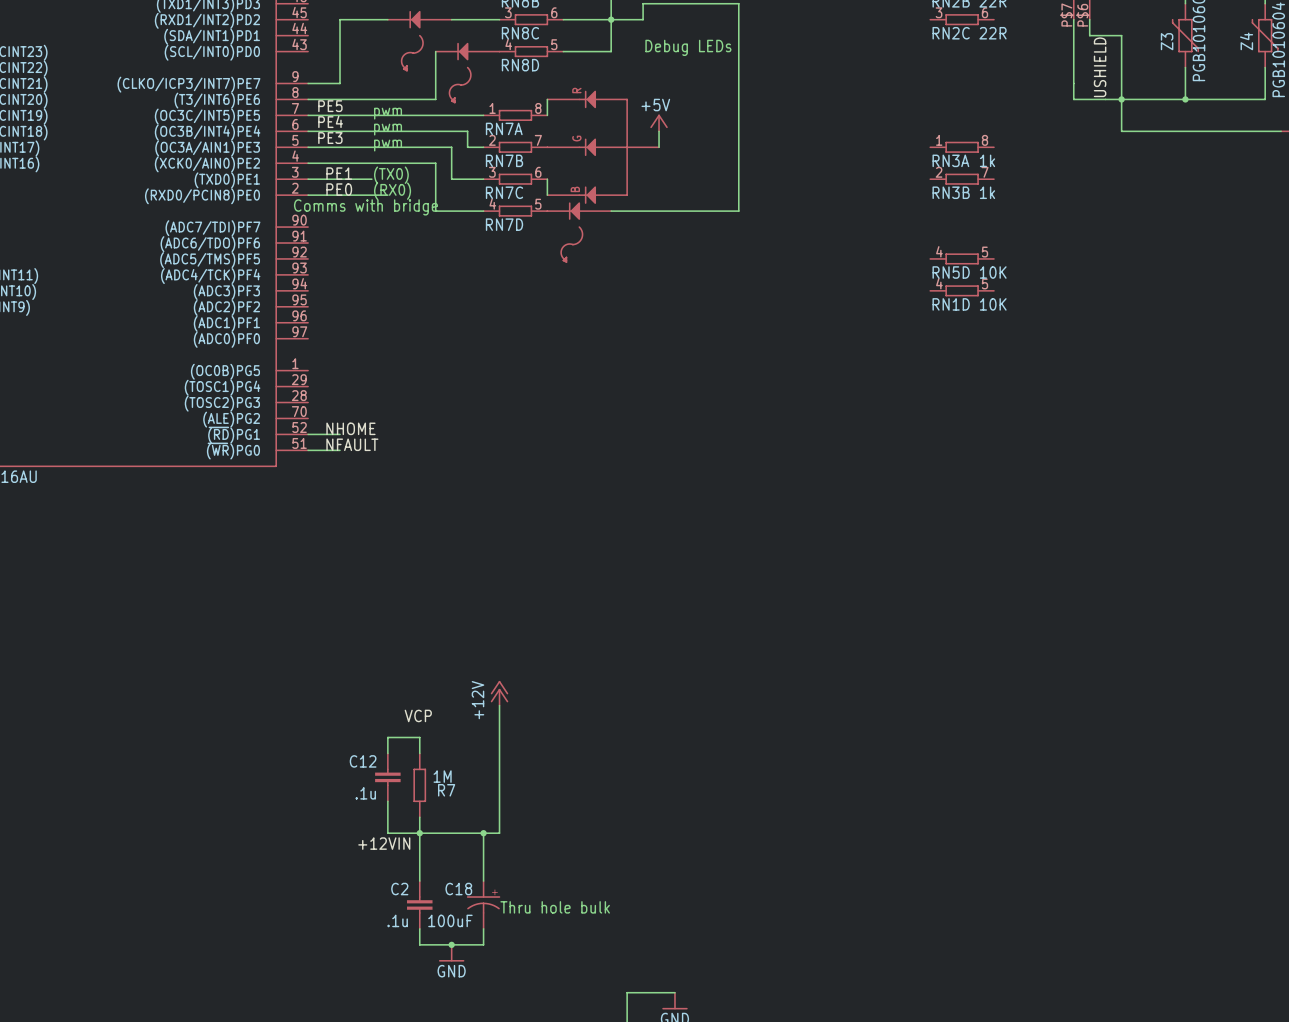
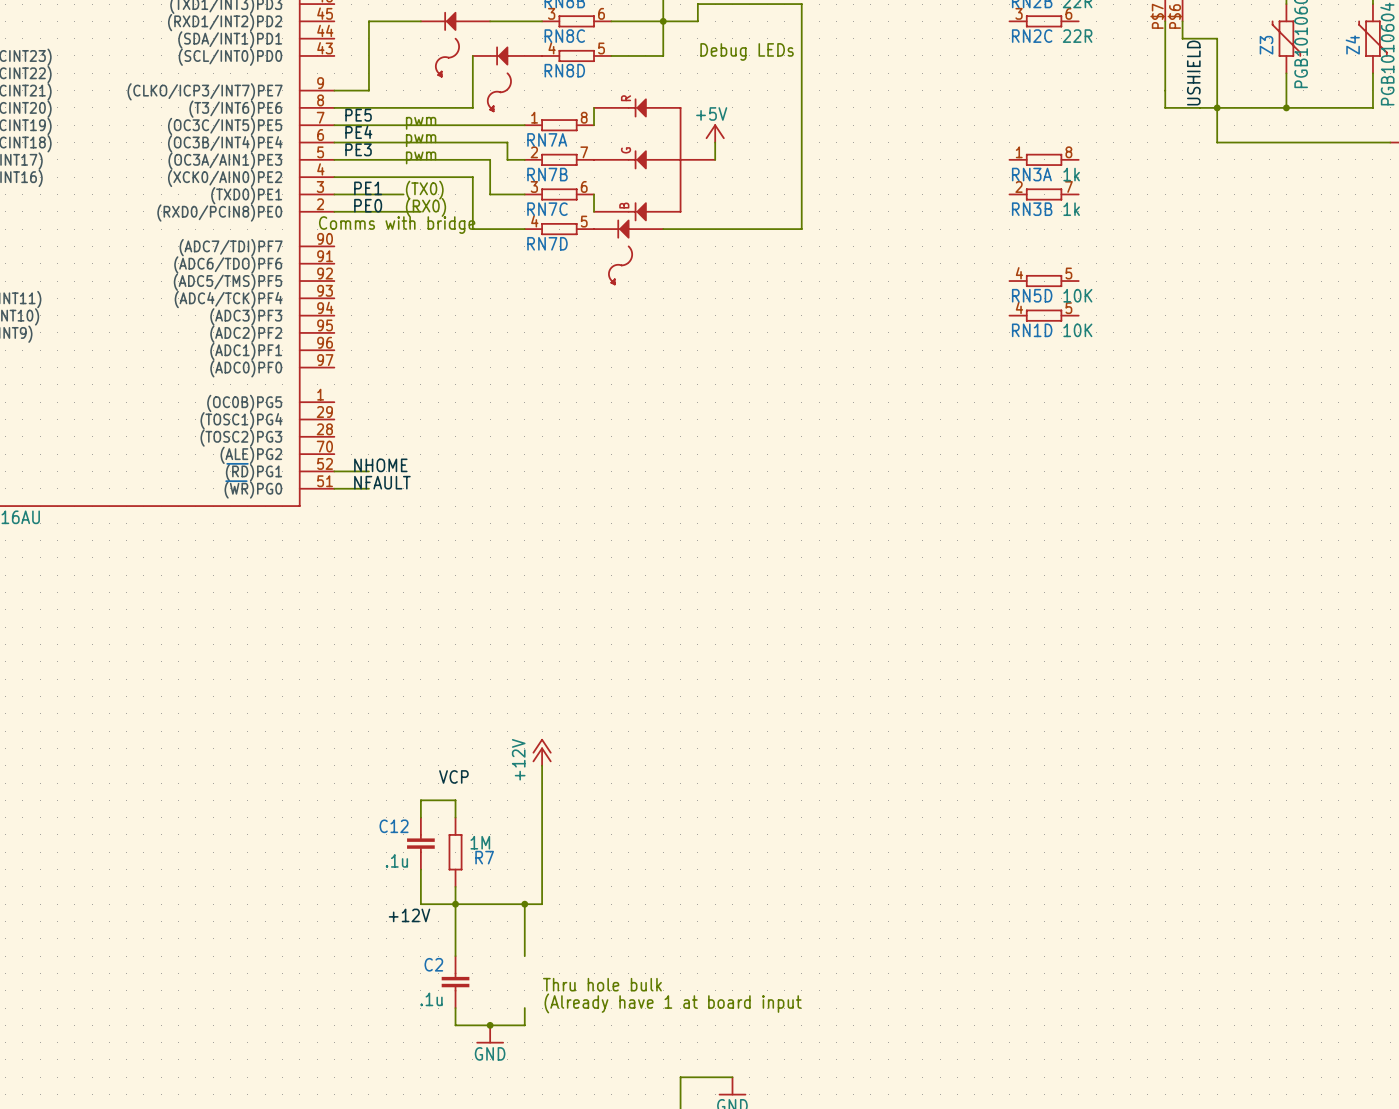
label: +12VIN (384, 843) -> +12V (409, 915)
C18: 100uF (483, 904) -> none
text: none -> (Already have 1 at board input (673, 1003)

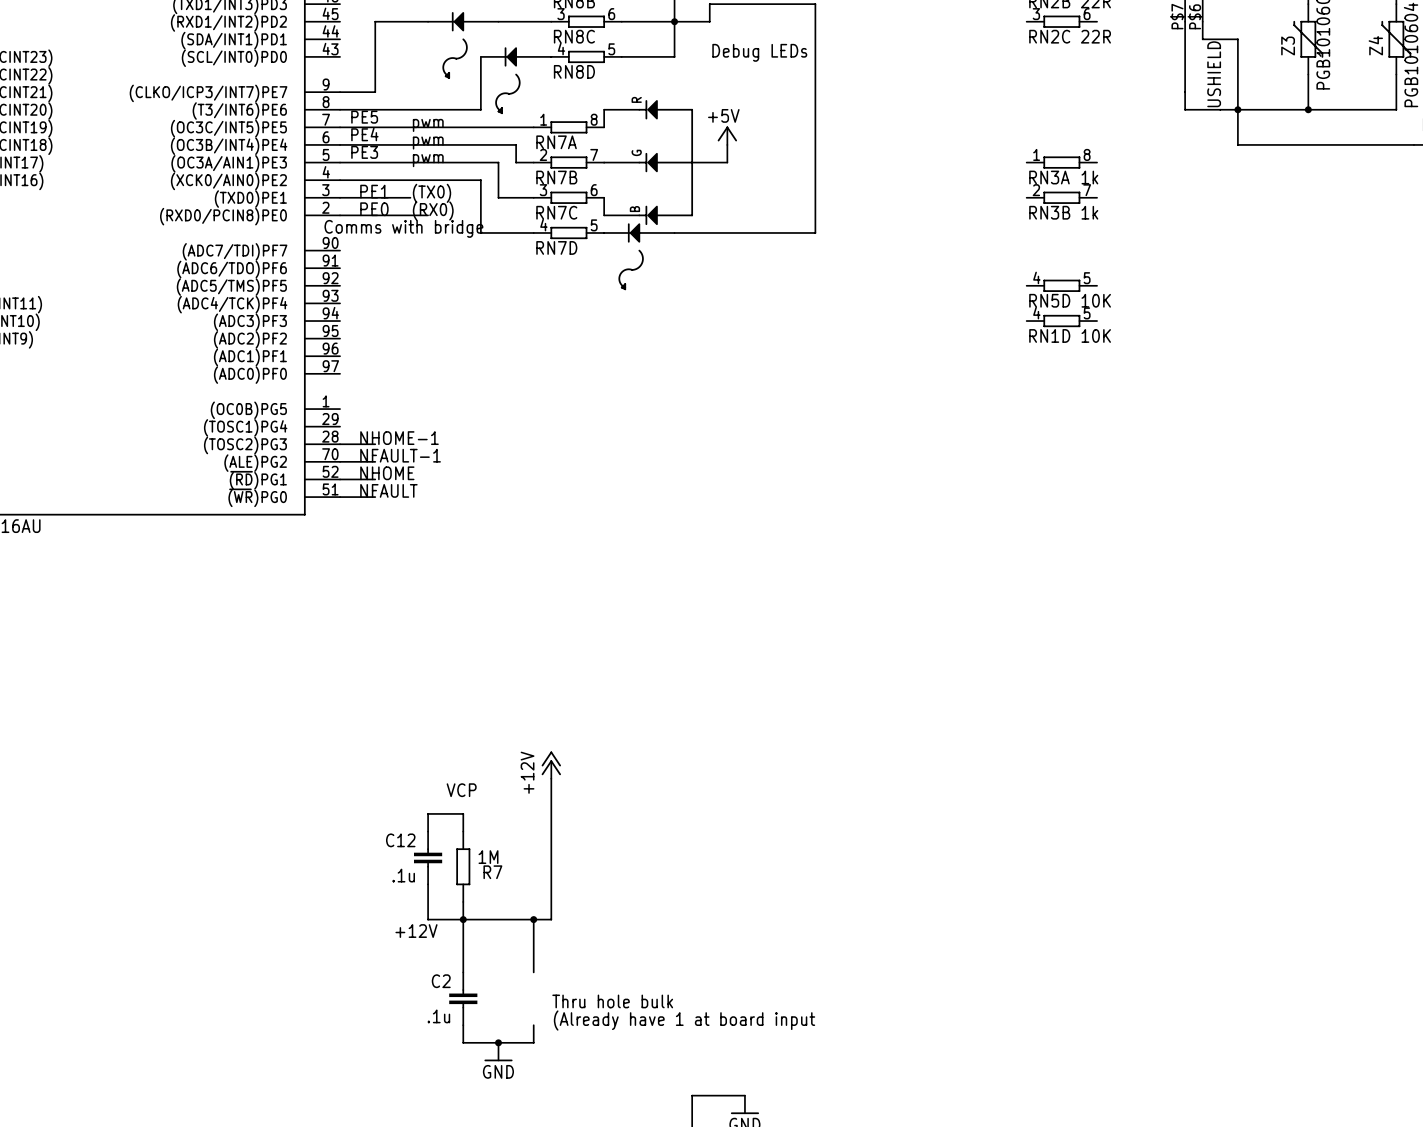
label: none -> NHOME-1 (399, 438)
wire: none -> (340, 444) (375, 444)
label: none -> NFAULT-1 (400, 455)
wire: none -> (340, 461) (375, 461)

